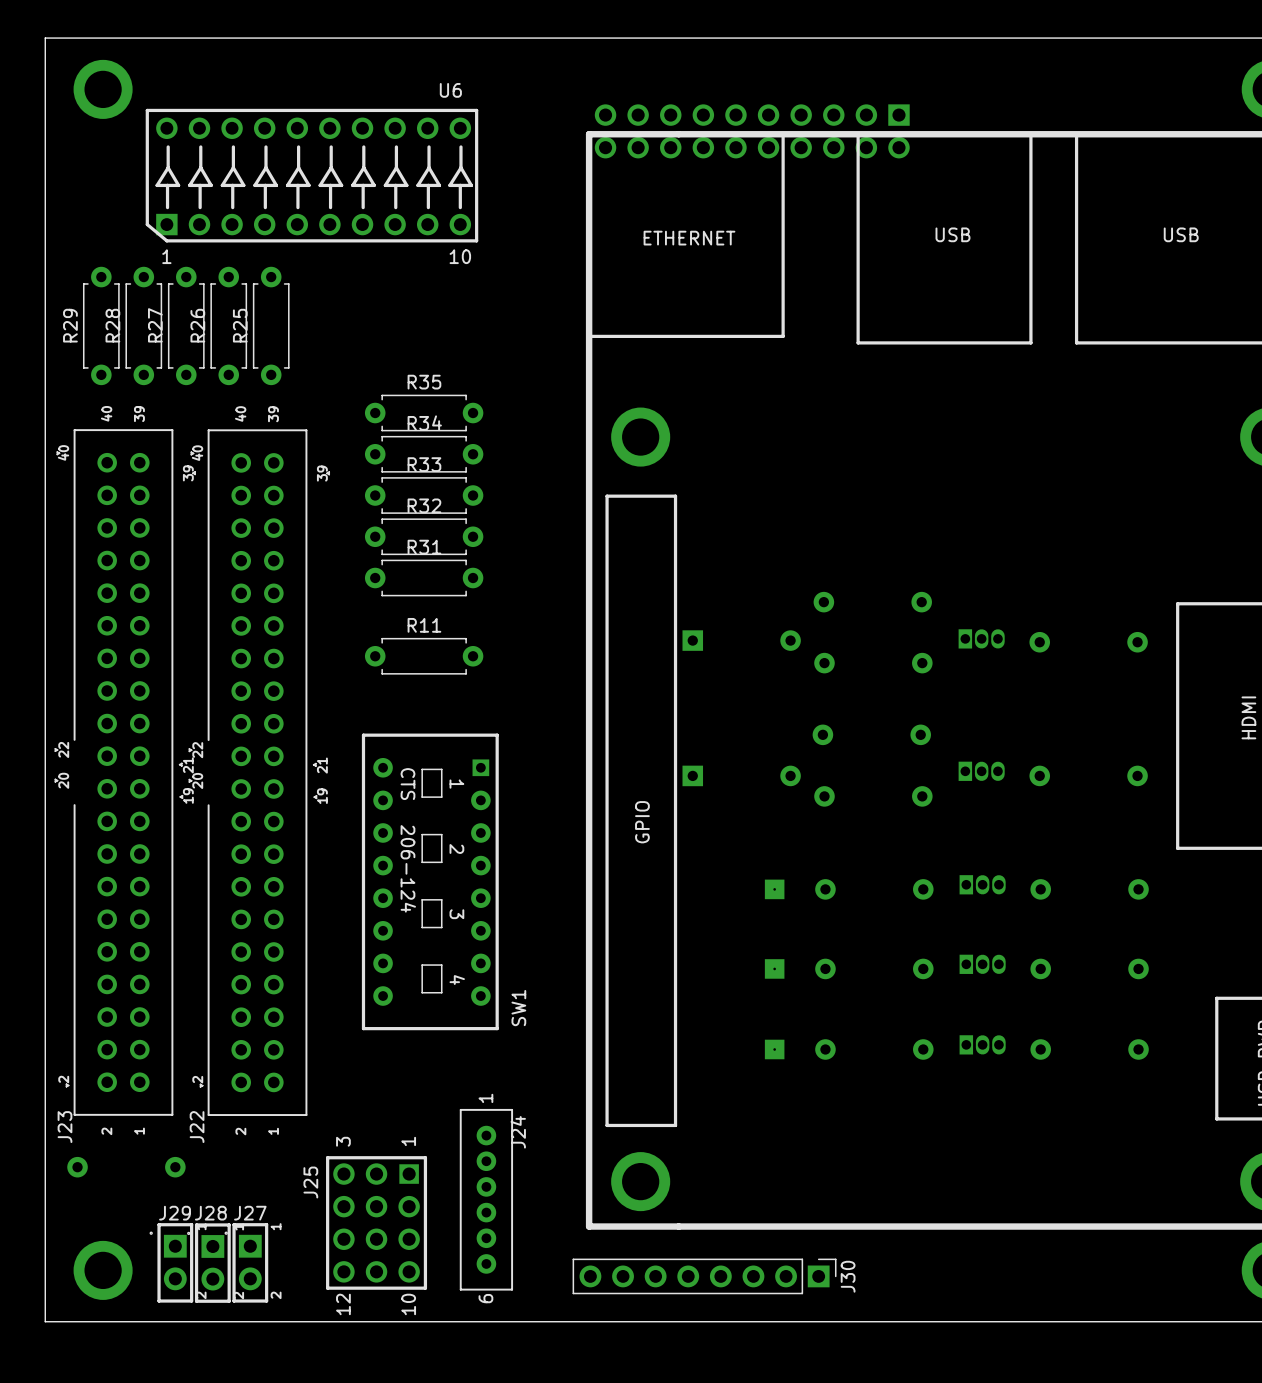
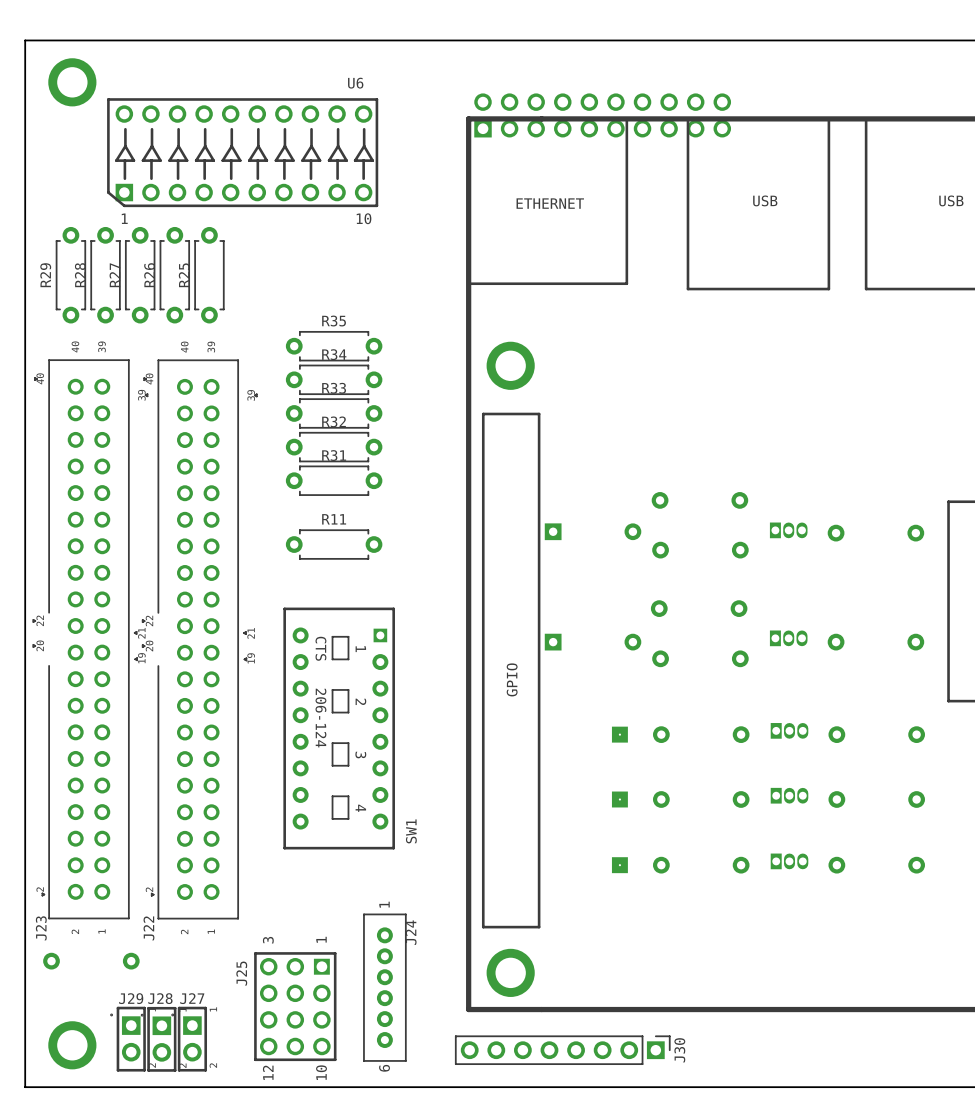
part rotation: 0° (752, 131) -> 180° (602, 115)

